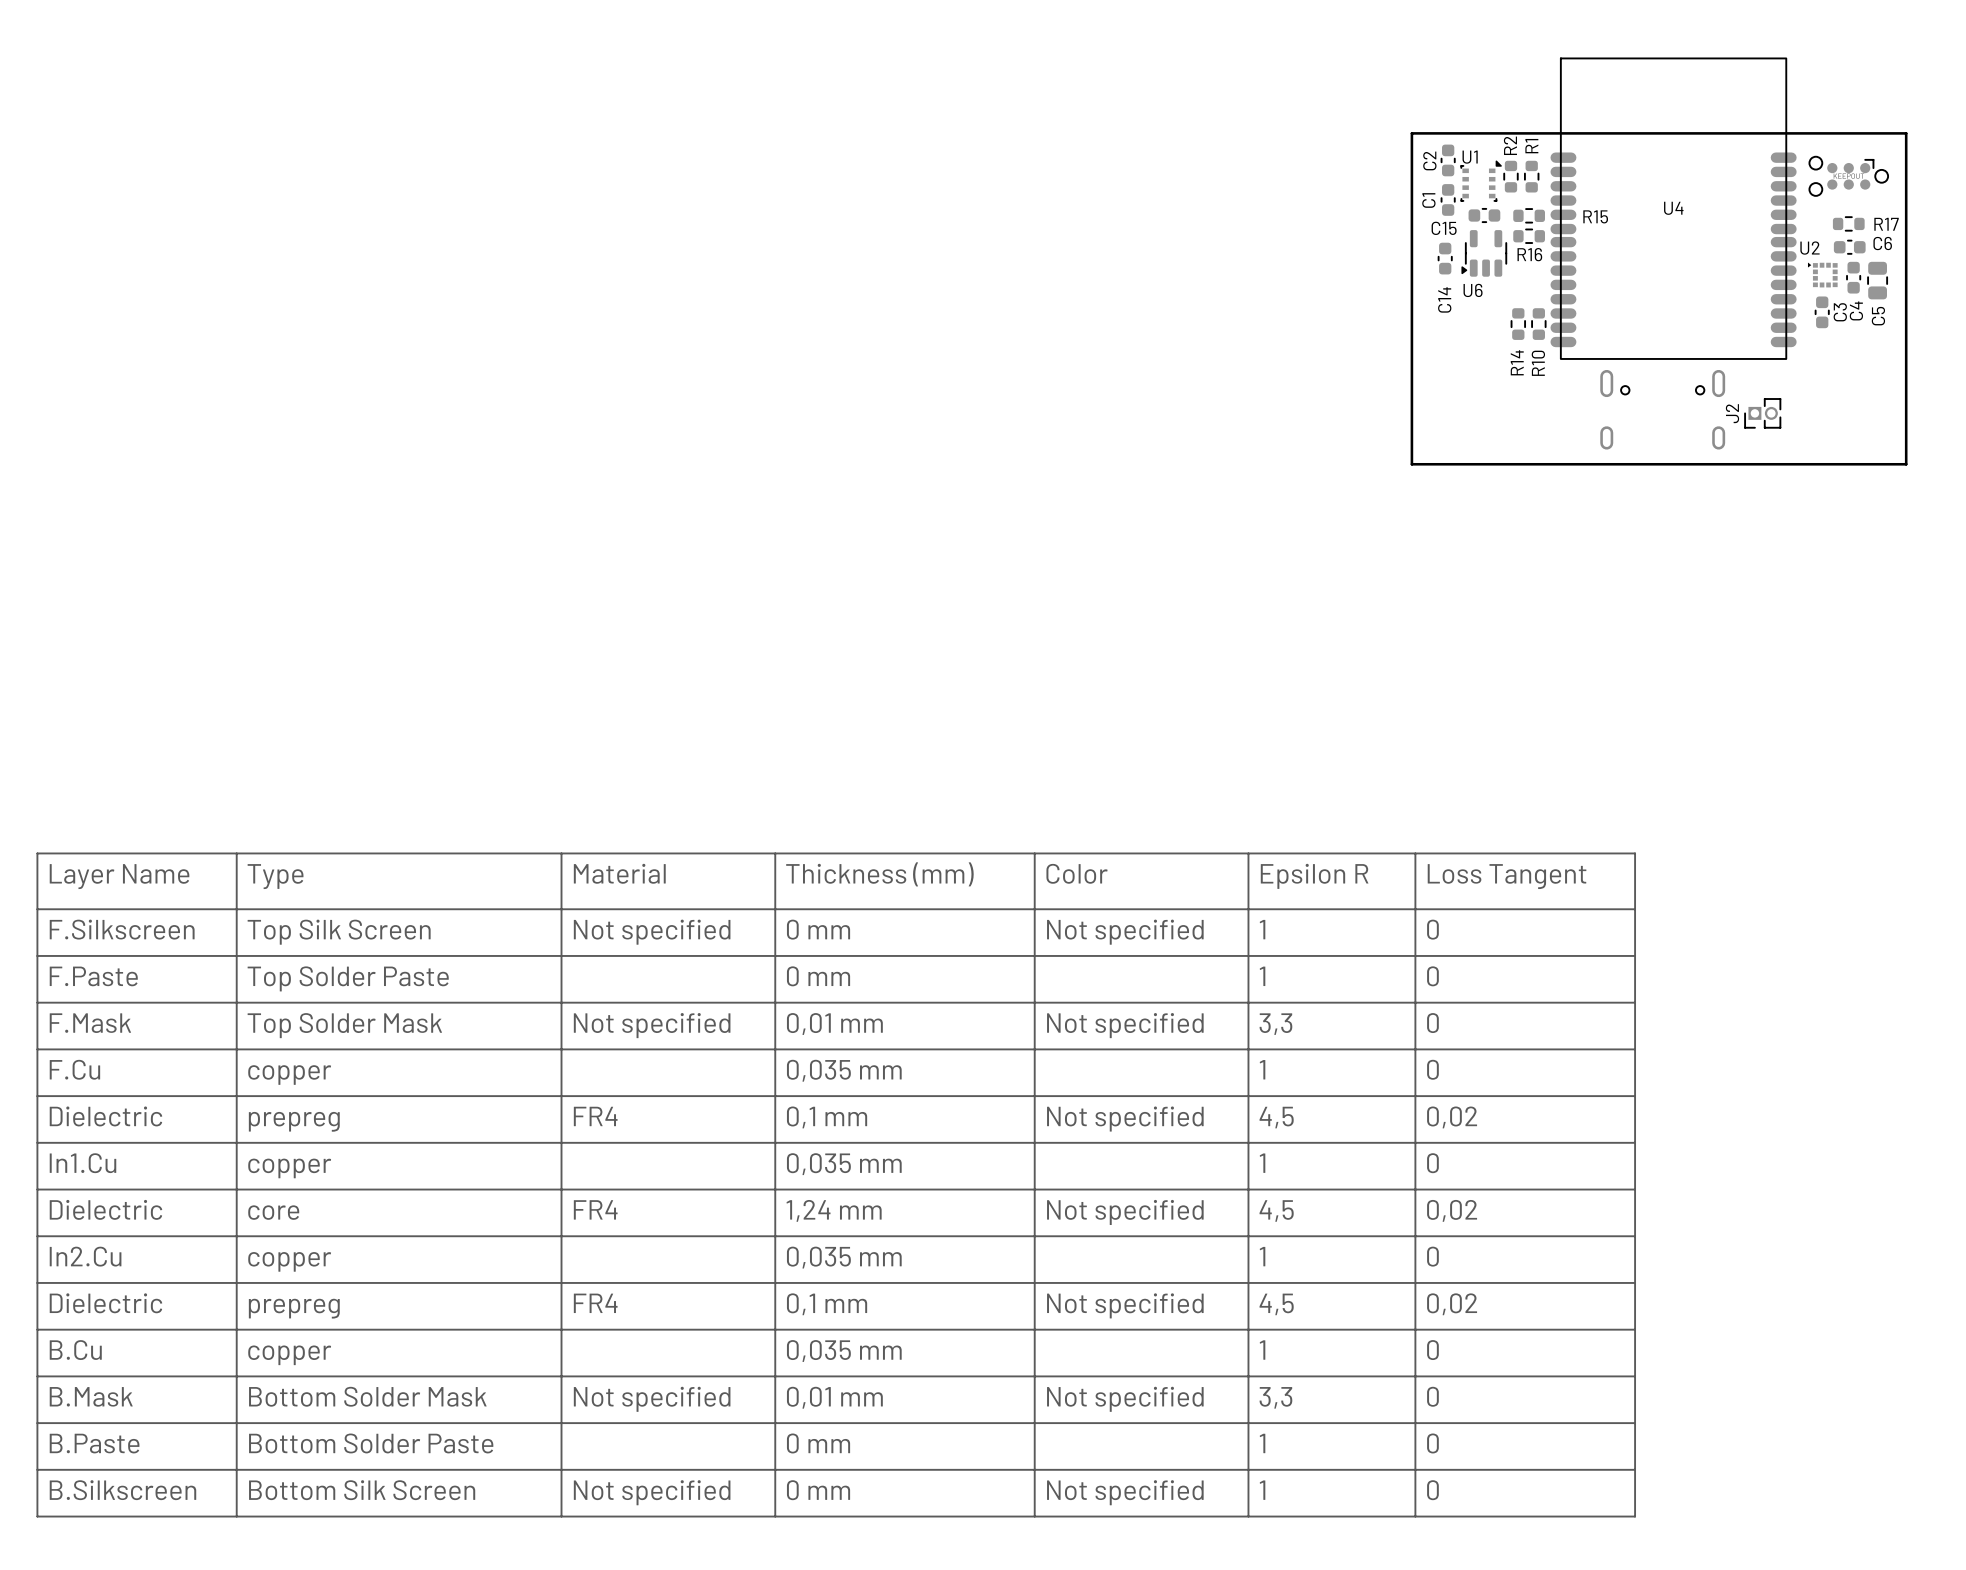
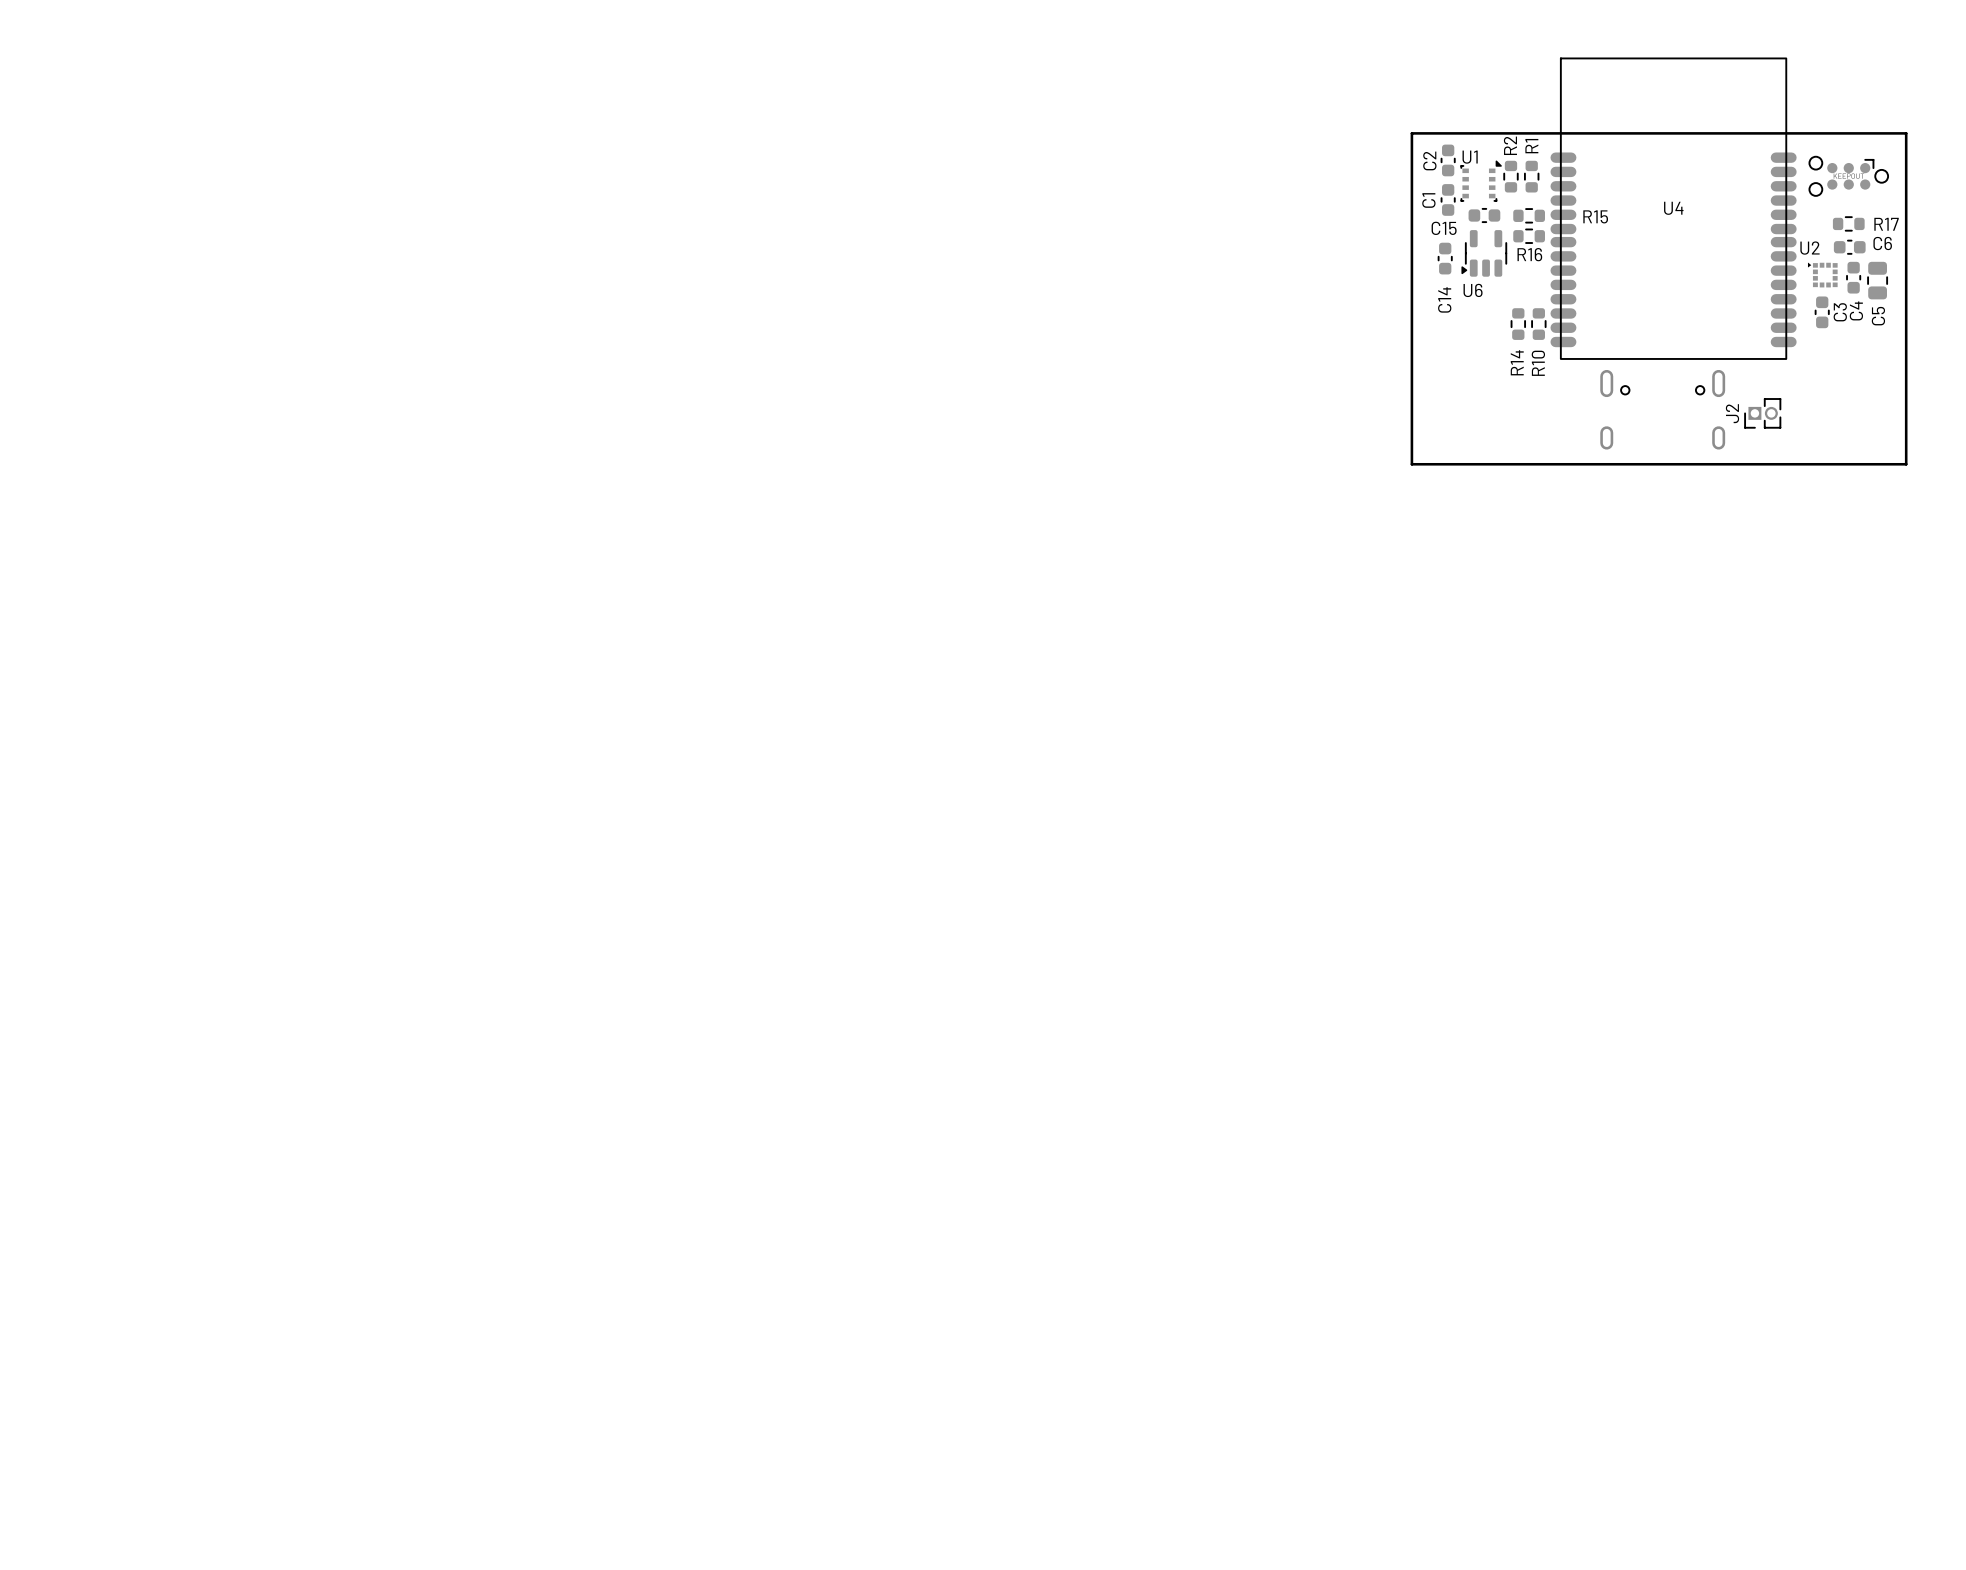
line: (37, 853) (37, 1516) (1635, 1516) (1635, 853) (37, 853) -> none
line: (236, 853) (236, 1516) -> none
line: (561, 853) (561, 1516) -> none
line: (775, 853) (775, 1516) -> none
line: (1034, 853) (1034, 1516) -> none
line: (1248, 853) (1248, 1516) -> none
line: (1415, 853) (1415, 1516) -> none
text: Material (619, 873) -> none
text: Color (1077, 873) -> none
text: Thickness (mm) (879, 874) -> none
text: Layer Name (119, 876) -> none
text: Type (275, 876) -> none
text: Epsilon R (1314, 876) -> none
text: Loss Tangent (1507, 876) -> none
line: (37, 909) (1635, 909) -> none
text: F.Silkscreen (122, 929) -> none
text: 0 mm (818, 929) -> none
text: 1 (1262, 929) -> none
text: 0 (1432, 929) -> none
text: Top Silk Screen (339, 932) -> none
text: Not specified (652, 932) -> none
text: Not specified (1125, 932) -> none
line: (37, 955) (1635, 955) -> none
text: F.Paste (93, 976) -> none
text: 0 mm (818, 976) -> none
text: 1 (1262, 976) -> none
text: 0 (1432, 976) -> none
text: Top Solder Paste (348, 978) -> none
line: (37, 1002) (1635, 1002) -> none
text: F.Mask (90, 1023) -> none
text: 0 (1432, 1023) -> none
text: 0,01 mm (834, 1024) -> none
text: 3,3 (1275, 1024) -> none
text: Top Solder Mask (344, 1025) -> none
text: Not specified (652, 1025) -> none
text: Not specified (1125, 1025) -> none
line: (37, 1049) (1635, 1049) -> none
text: F.Cu (74, 1069) -> none
text: 1 (1262, 1069) -> none
text: 0 (1432, 1069) -> none
text: 0,035 mm (844, 1070) -> none
text: copper (289, 1075) -> none
line: (37, 1096) (1635, 1096) -> none
text: Dielectric (105, 1116) -> none
text: FR4 (595, 1116) -> none
text: 0,1 mm (827, 1117) -> none
text: 4,5 (1276, 1117) -> none
text: 0,02 (1452, 1117) -> none
text: Not specified (1125, 1119) -> none
text: prepreg (294, 1121) -> none
line: (37, 1142) (1635, 1142) -> none
text: In1.Cu (82, 1163) -> none
text: 1 (1262, 1163) -> none
text: 0 (1432, 1163) -> none
text: 0,035 mm (844, 1164) -> none
text: copper (289, 1168) -> none
line: (37, 1189) (1635, 1189) -> none
text: Dielectric (105, 1209) -> none
text: FR4 (595, 1209) -> none
text: 1,24 mm (834, 1210) -> none
text: 4,5 (1276, 1210) -> none
text: 0,02 (1452, 1210) -> none
text: core (273, 1212) -> none
text: Not specified (1125, 1212) -> none
line: (37, 1236) (1635, 1236) -> none
text: In2.Cu (85, 1256) -> none
text: 1 (1262, 1256) -> none
text: 0 (1432, 1256) -> none
text: 0,035 mm (844, 1257) -> none
text: copper (289, 1261) -> none
line: (37, 1282) (1635, 1282) -> none
text: Dielectric (105, 1303) -> none
text: FR4 (595, 1303) -> none
text: 0,1 mm (827, 1304) -> none
text: 4,5 (1276, 1304) -> none
text: 0,02 (1452, 1304) -> none
text: Not specified (1125, 1305) -> none
text: prepreg (294, 1308) -> none
line: (37, 1329) (1635, 1329) -> none
text: B.Cu (75, 1350) -> none
text: 1 (1262, 1350) -> none
text: 0 (1432, 1350) -> none
text: 0,035 mm (844, 1351) -> none
text: copper (289, 1355) -> none
line: (37, 1376) (1635, 1376) -> none
text: B.Mask (91, 1396) -> none
text: Bottom Solder Mask (367, 1396) -> none
text: 0 (1432, 1396) -> none
text: 0,01 mm (834, 1397) -> none
text: 3,3 (1275, 1397) -> none
text: Not specified (652, 1399) -> none
text: Not specified (1125, 1399) -> none
line: (37, 1423) (1635, 1423) -> none
text: B.Paste (94, 1443) -> none
text: Bottom Solder Paste (371, 1443) -> none
text: 0 mm (818, 1443) -> none
text: 1 (1262, 1443) -> none
text: 0 (1432, 1443) -> none
line: (37, 1469) (1635, 1469) -> none
text: B.Silkscreen (122, 1490) -> none
text: Bottom Silk Screen (362, 1490) -> none
text: 0 mm (818, 1490) -> none
text: 1 (1262, 1490) -> none
text: 0 (1432, 1490) -> none
text: Not specified (652, 1492) -> none
text: Not specified (1125, 1492) -> none

